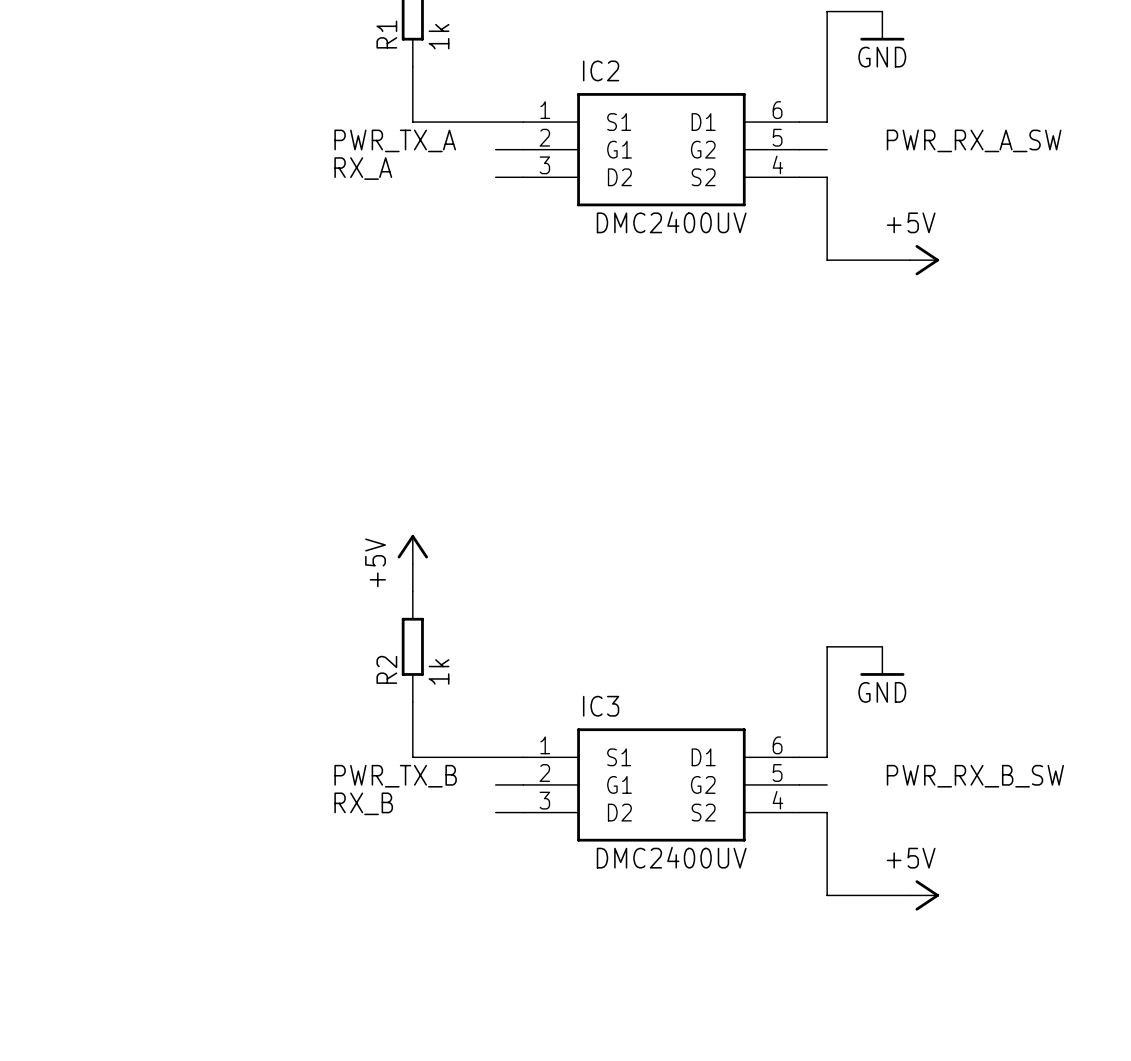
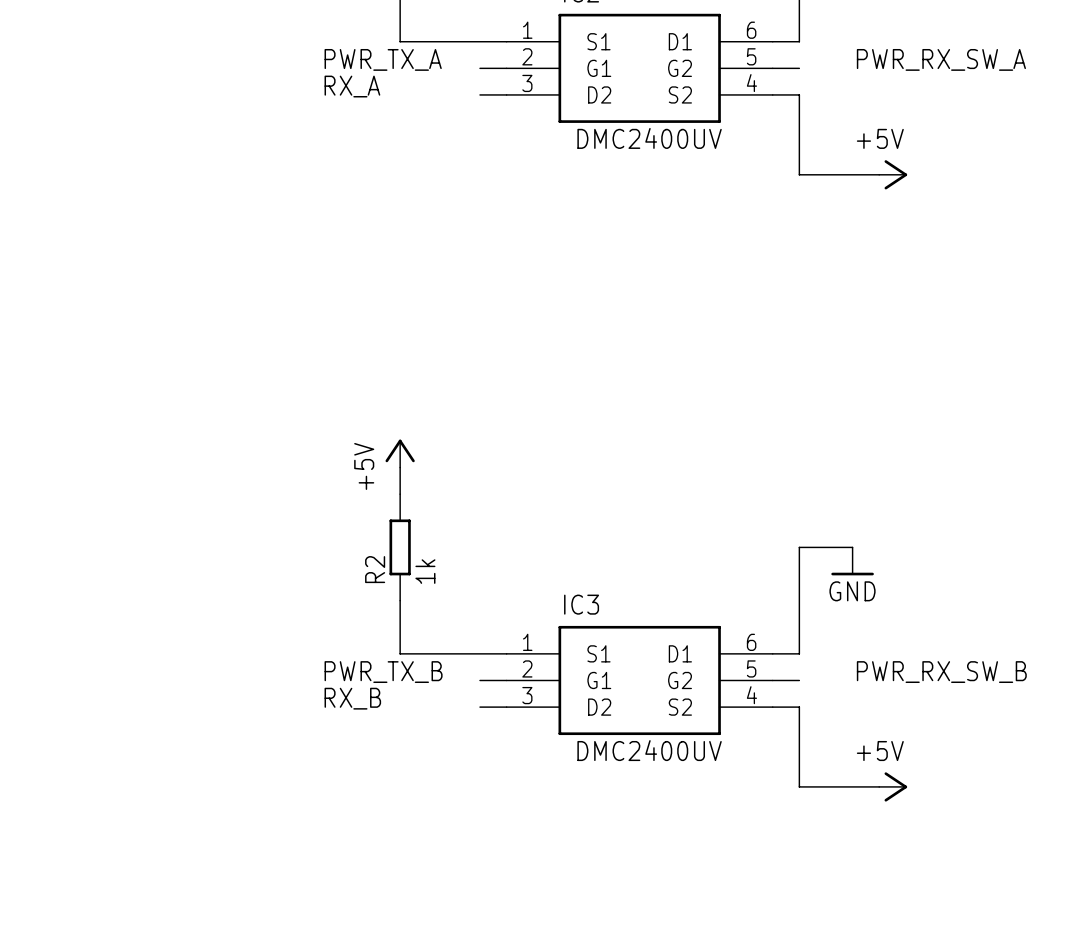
label: PWR_RX_A_SW (974, 140) -> PWR_RX_SW_A (941, 59)
label: PWR_RX_B_SW (975, 776) -> PWR_RX_SW_B (941, 672)

